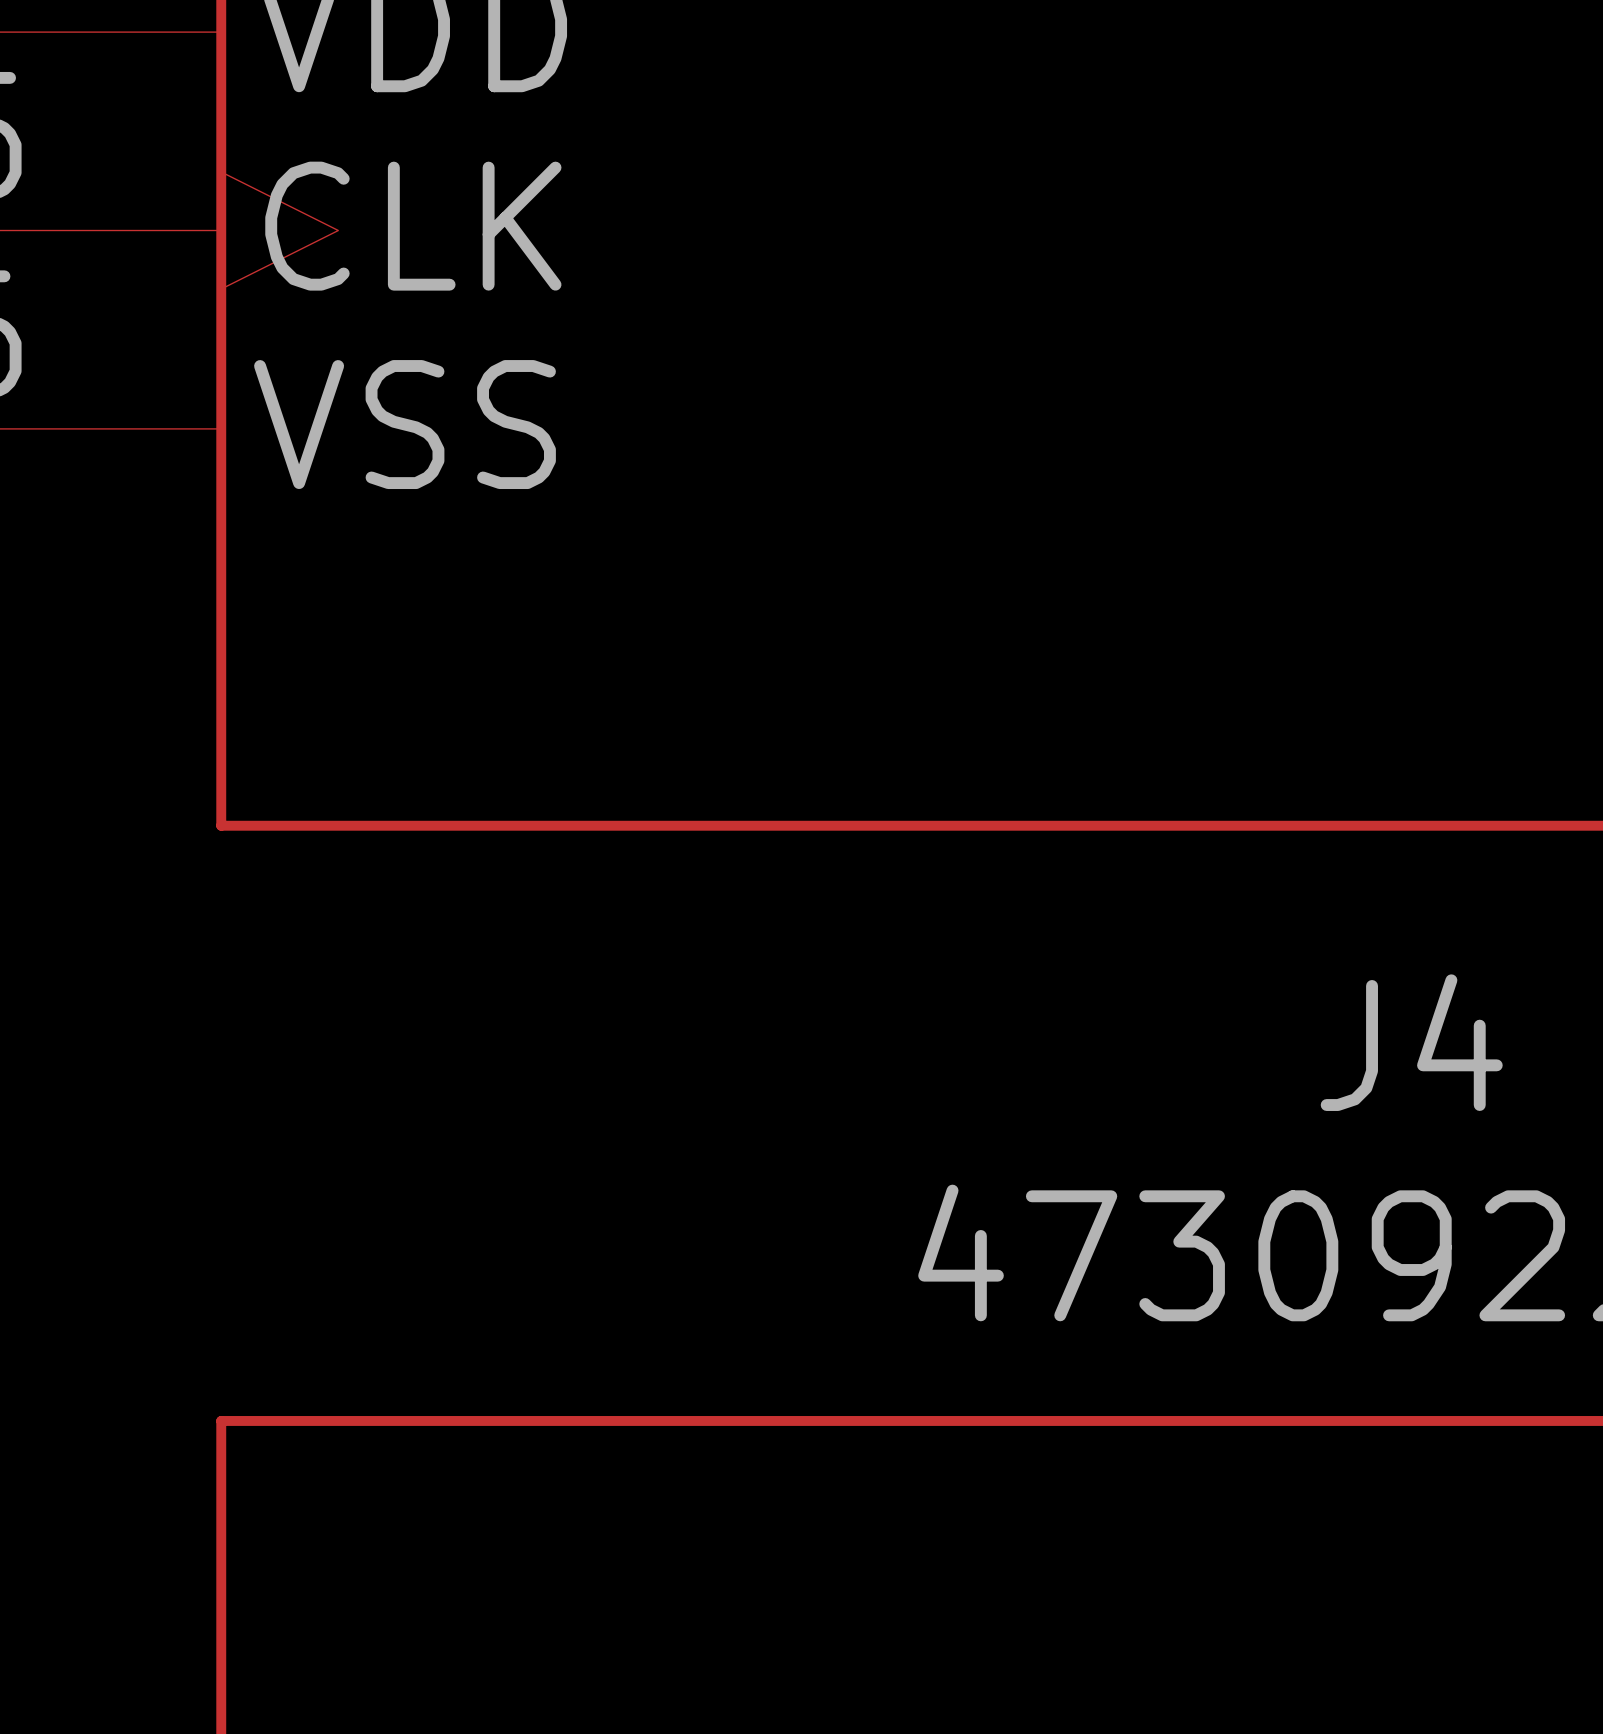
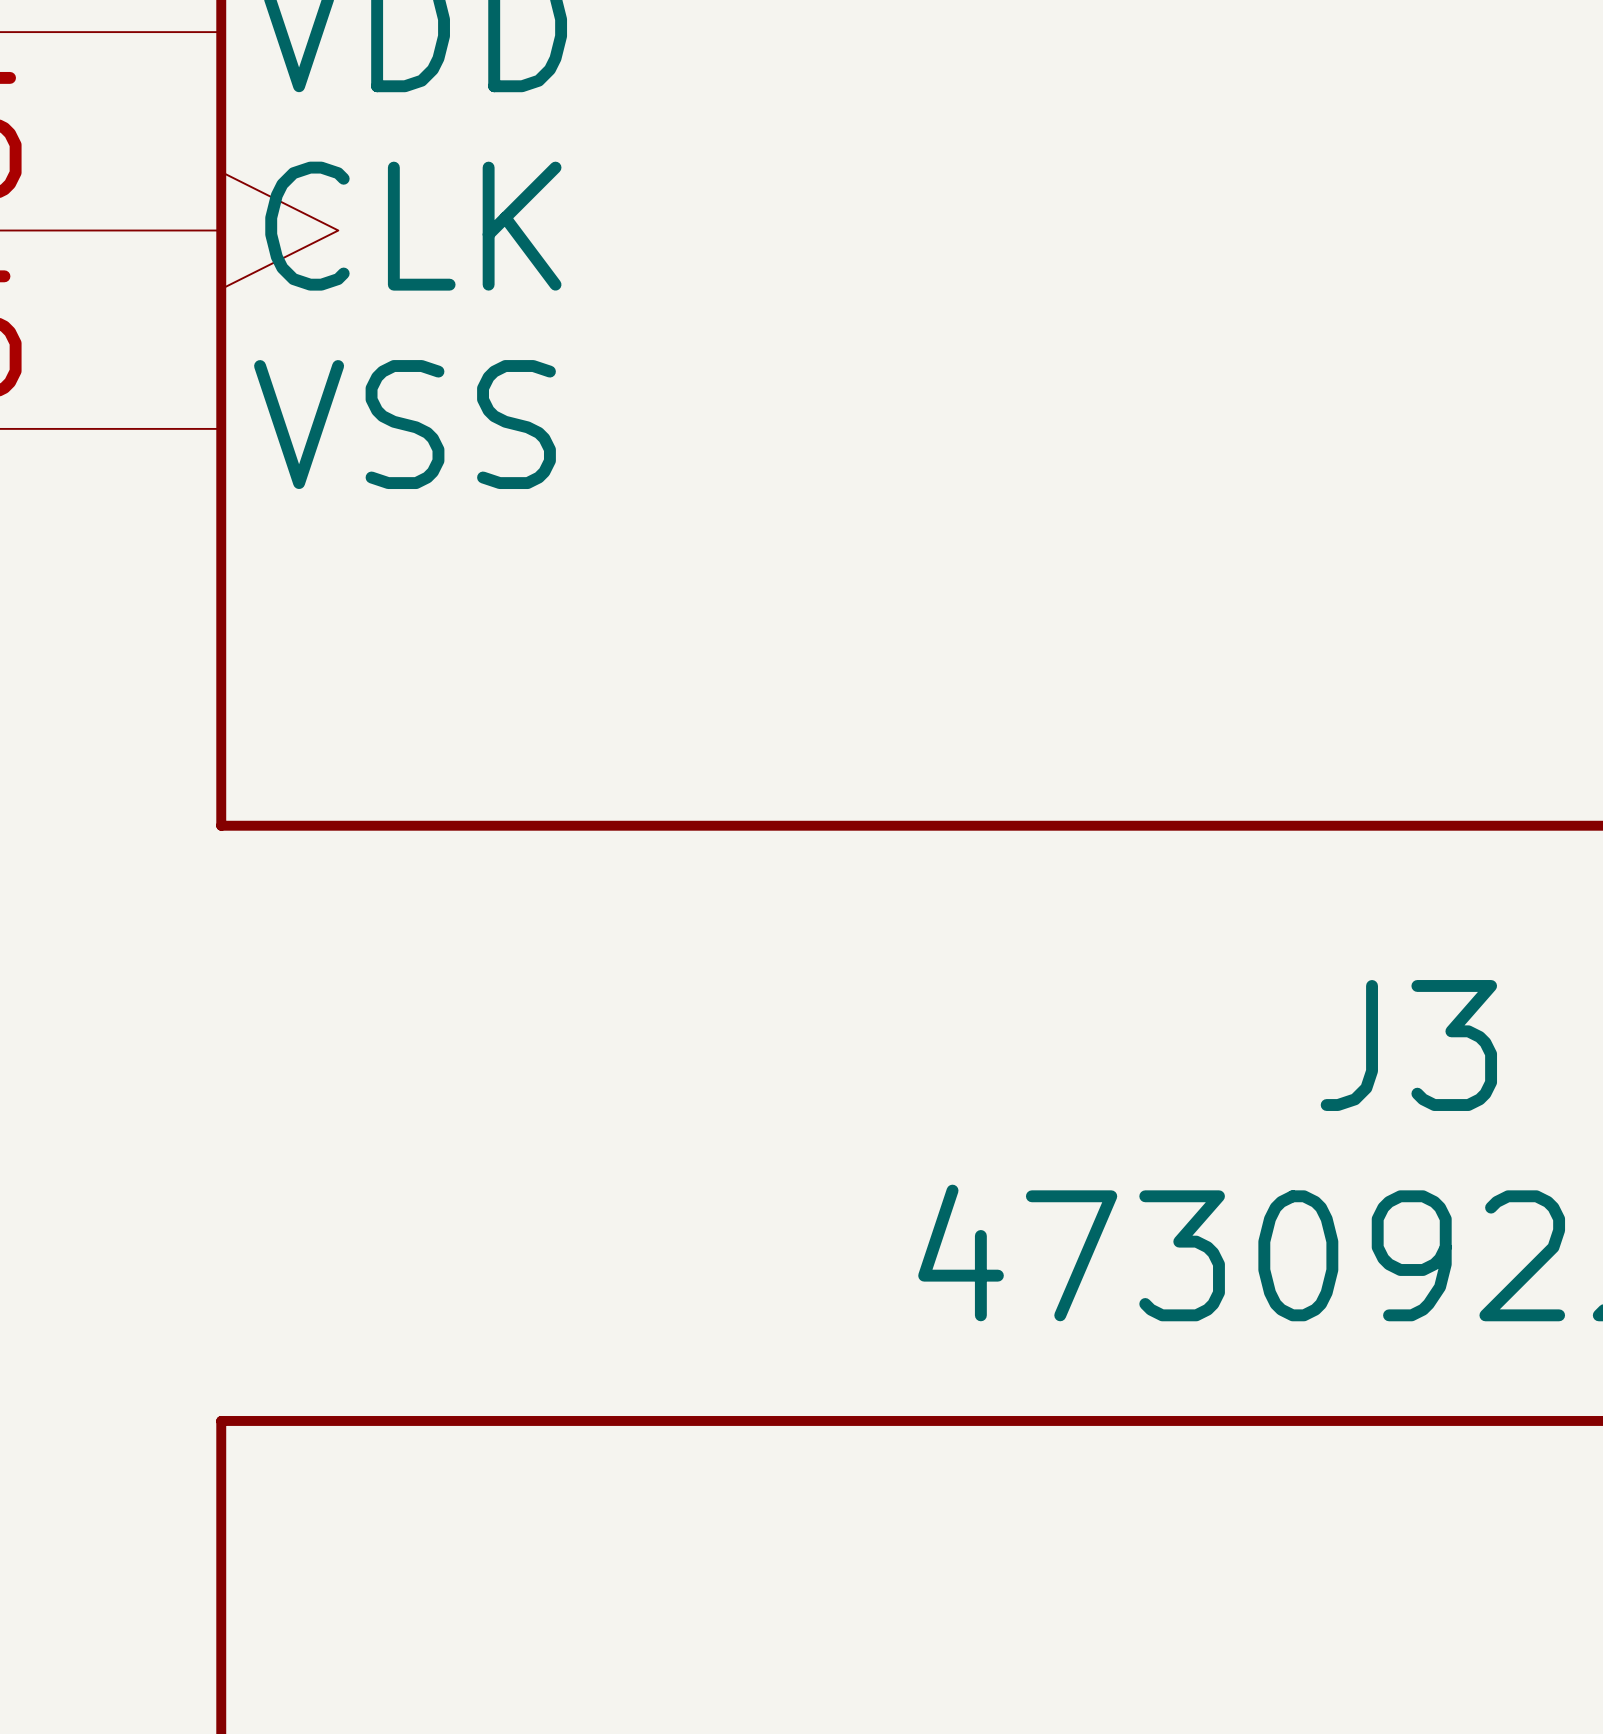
J4 name: J4 (1411, 1042) -> J3 (1408, 1045)

